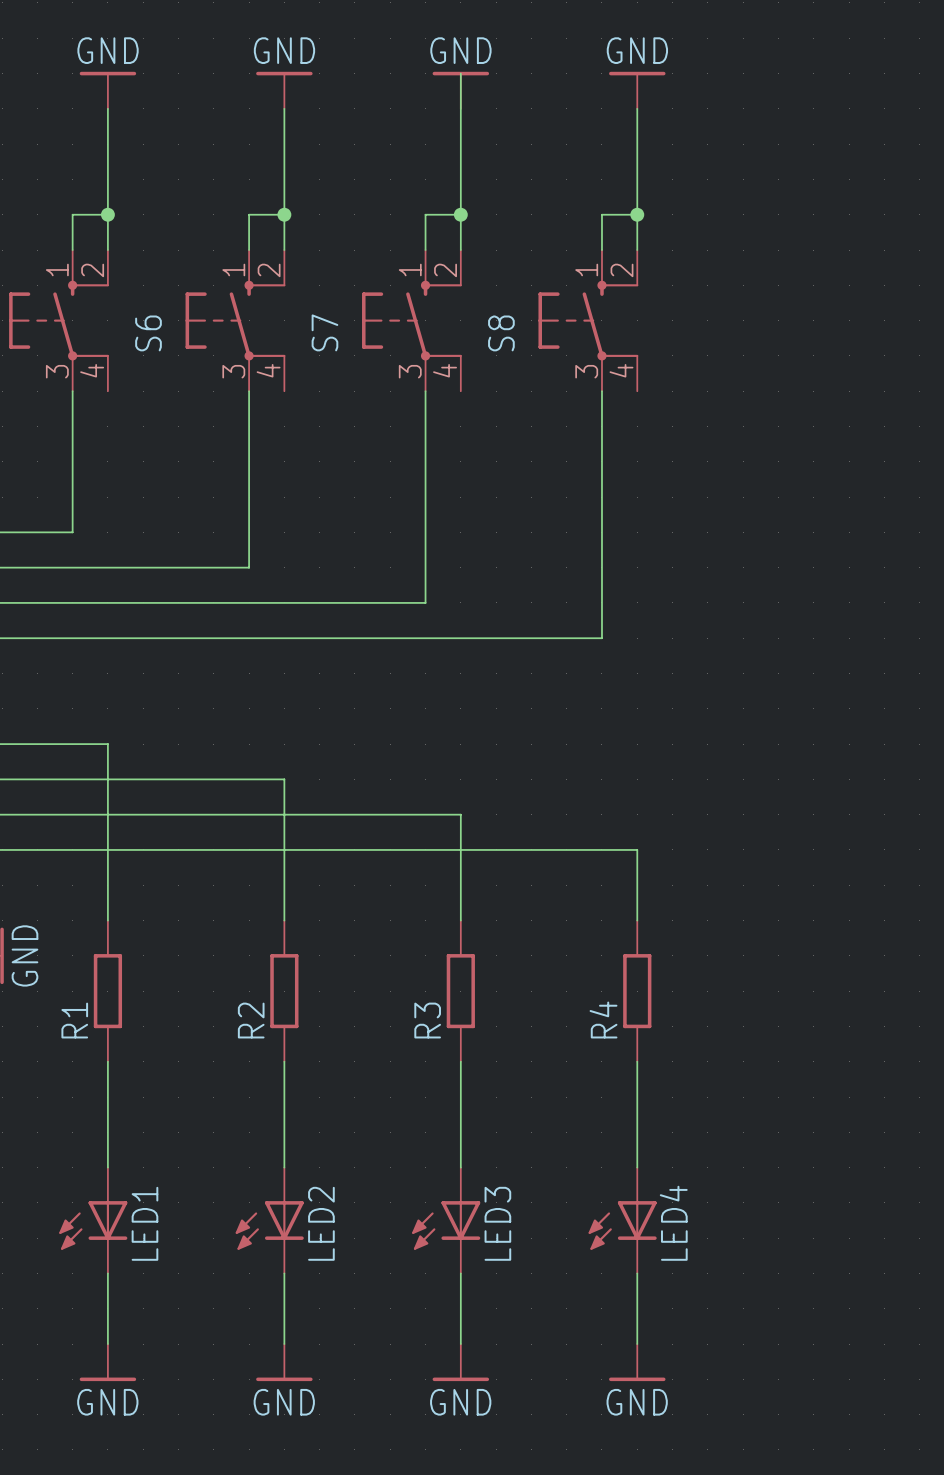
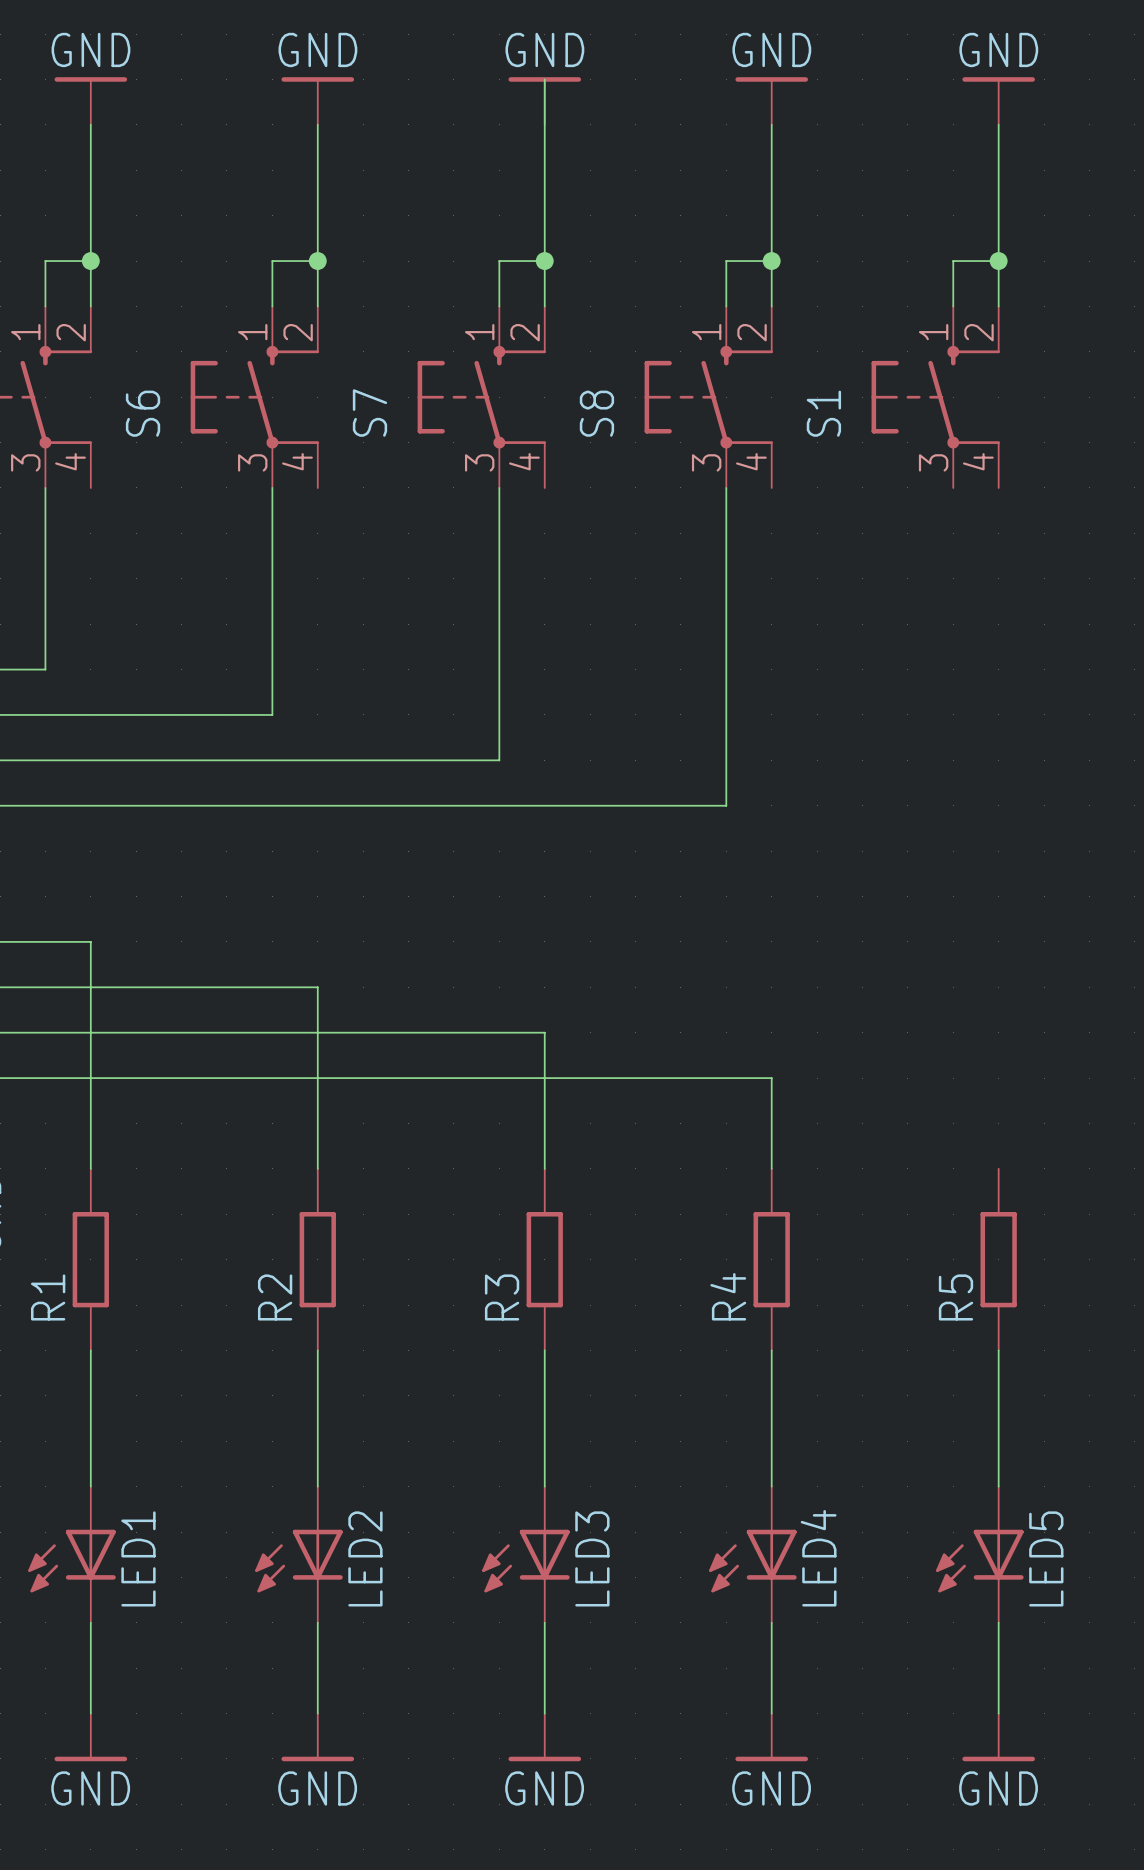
power symbol: none -> GND (998, 101)
wire: none -> (998, 124) (998, 306)
wire: none -> (998, 261) (953, 261) (953, 306)
junction: none -> (998, 261)
S1: none -> (935, 397)
R5: none -> (998, 1259)
wire: none -> (998, 1350) (998, 1486)
LED5: none -> (979, 1554)
wire: none -> (998, 1622) (998, 1713)
power symbol: none -> GND (998, 1737)

